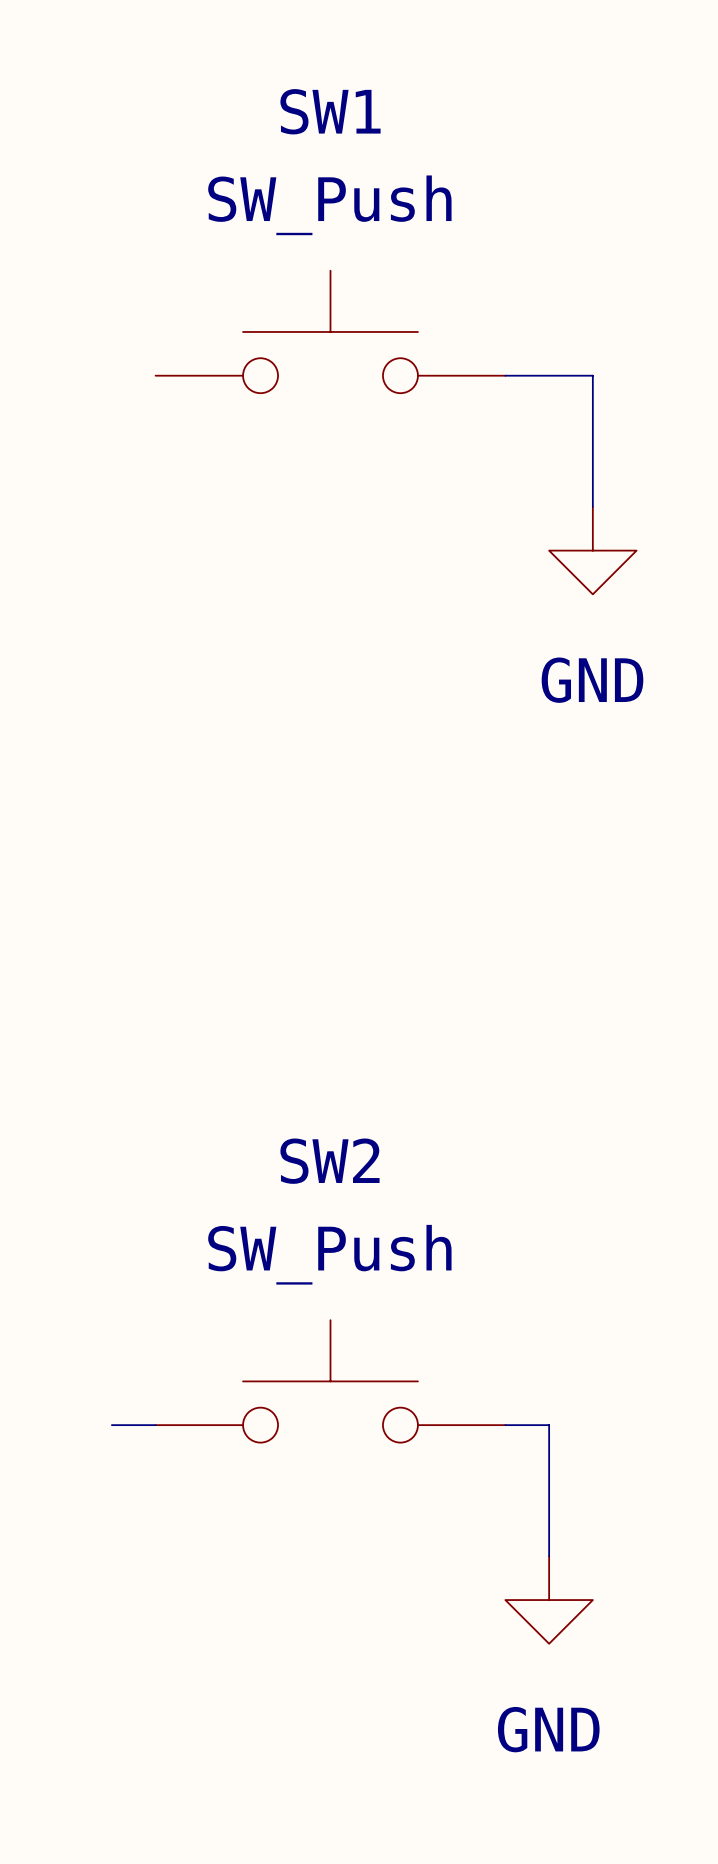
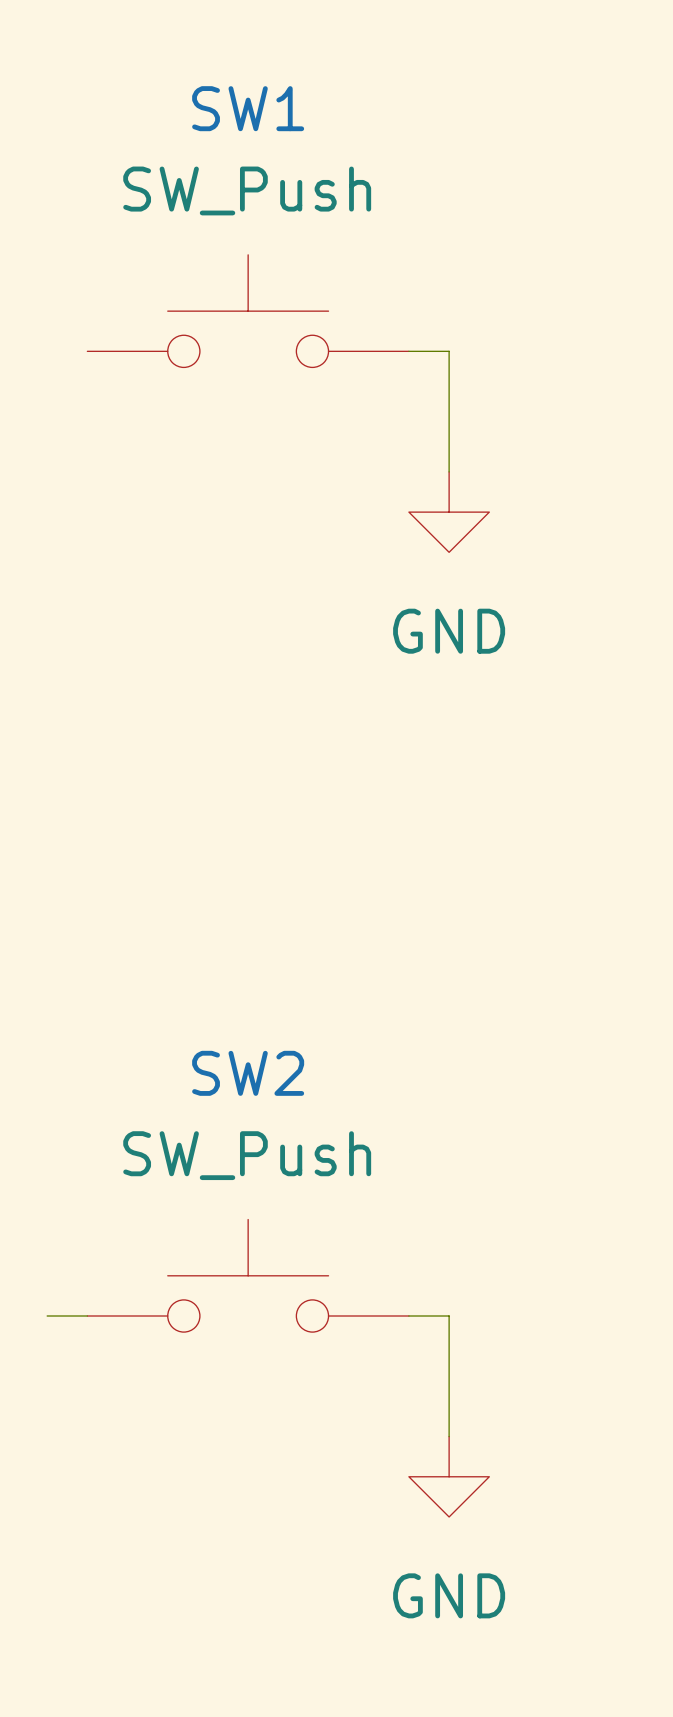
wire: (549, 375) (592, 375) (592, 506) -> (449, 351) (449, 471)
power symbol position: GND (592, 550) -> GND (449, 512)

